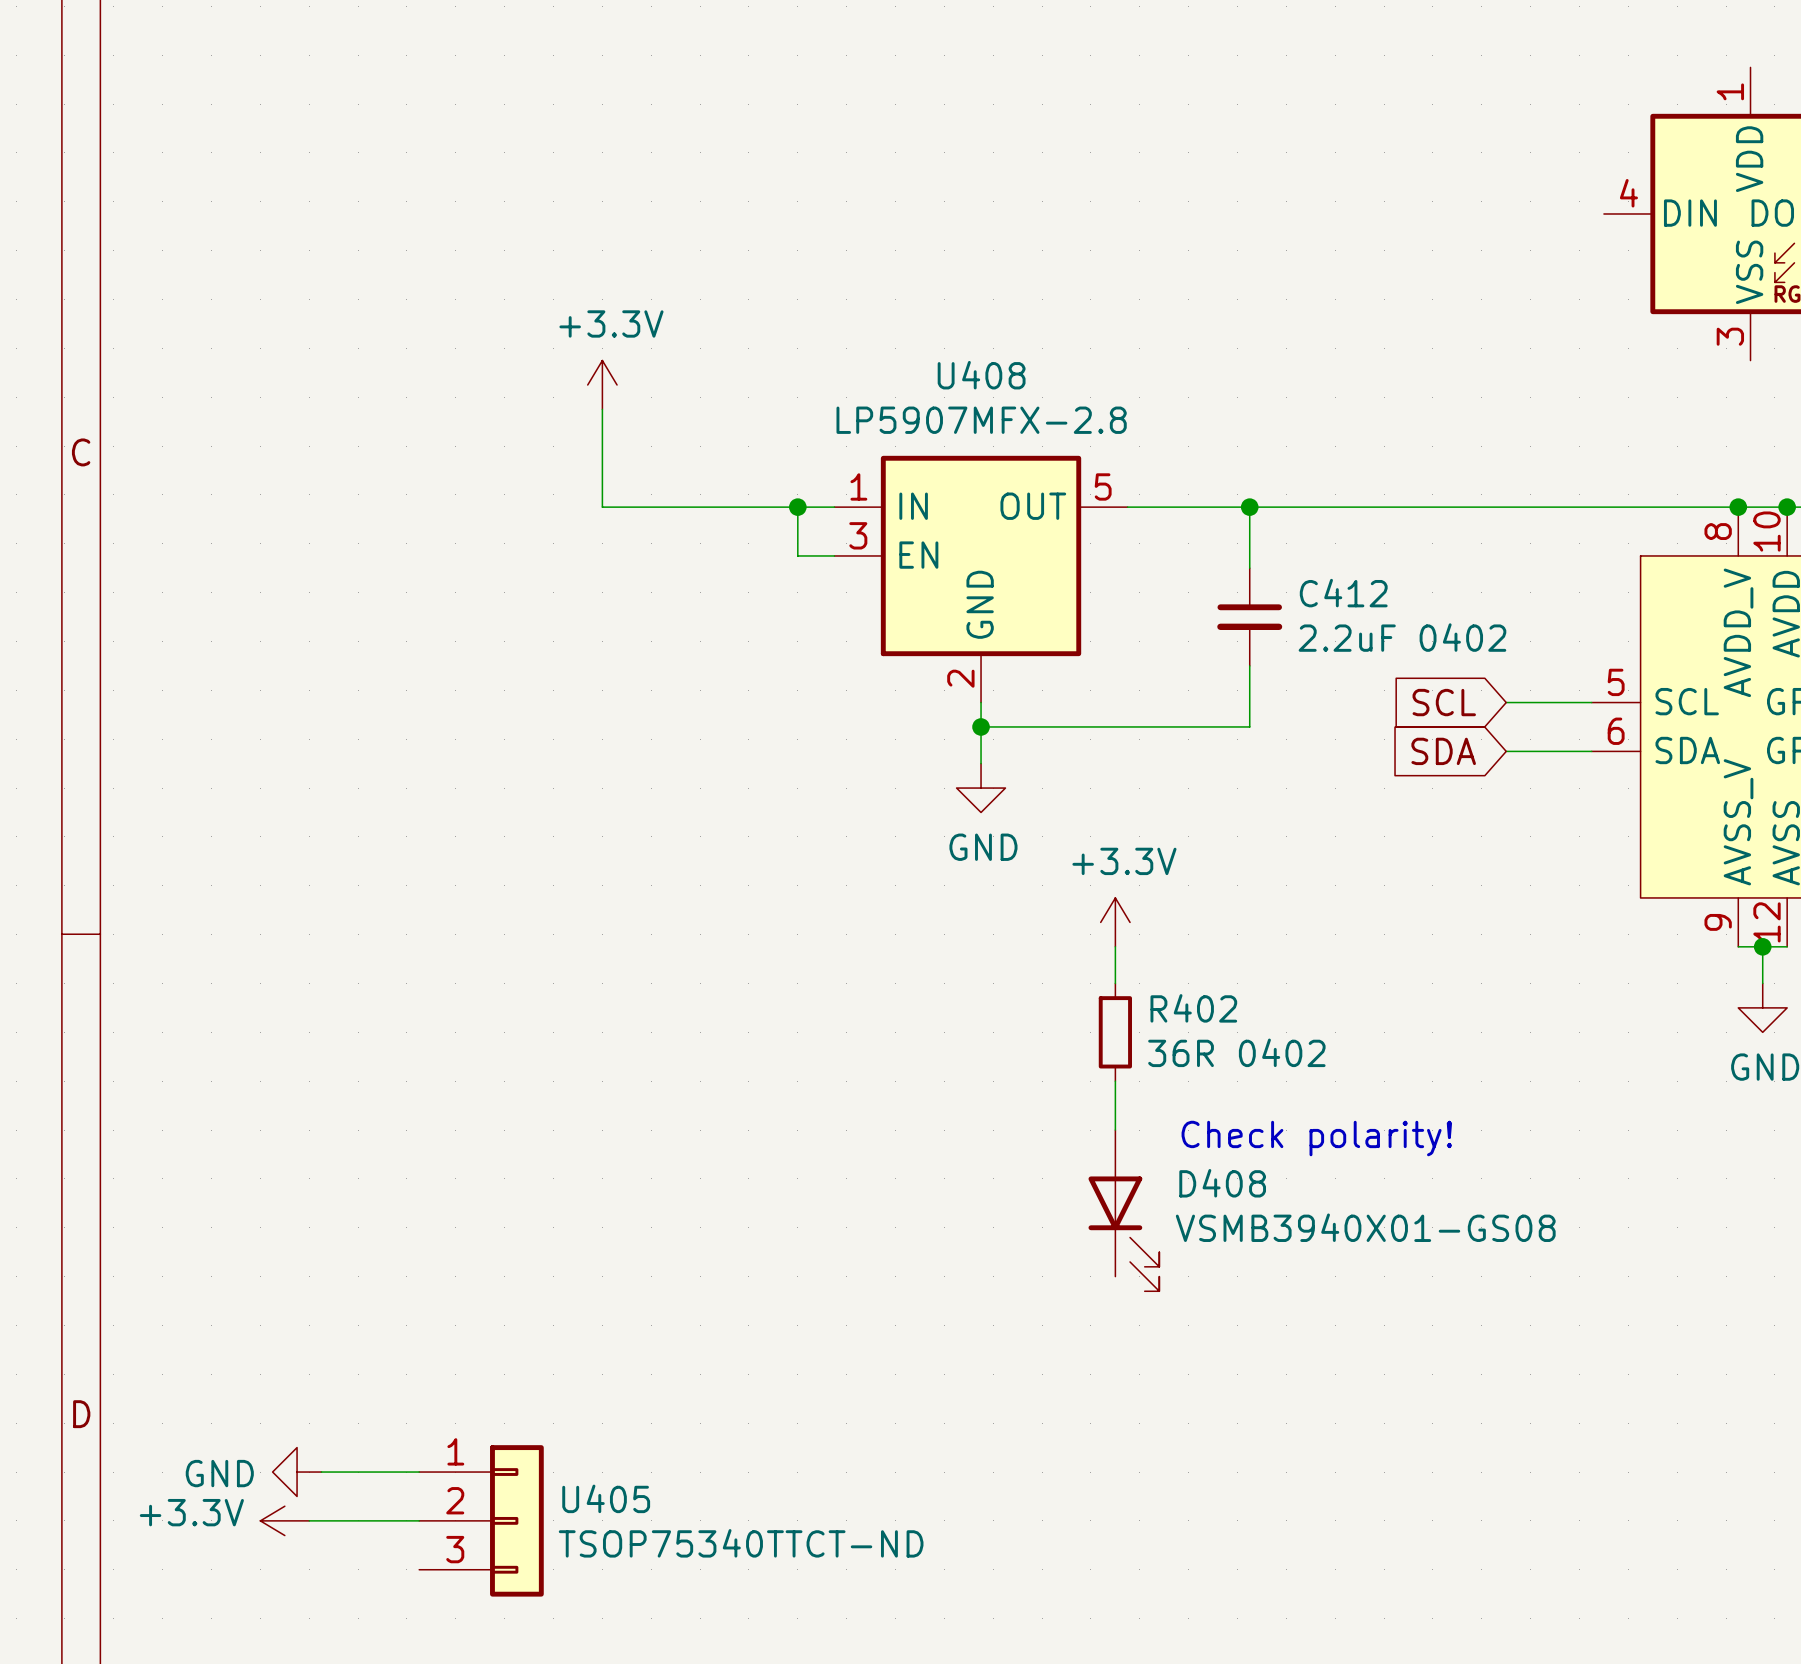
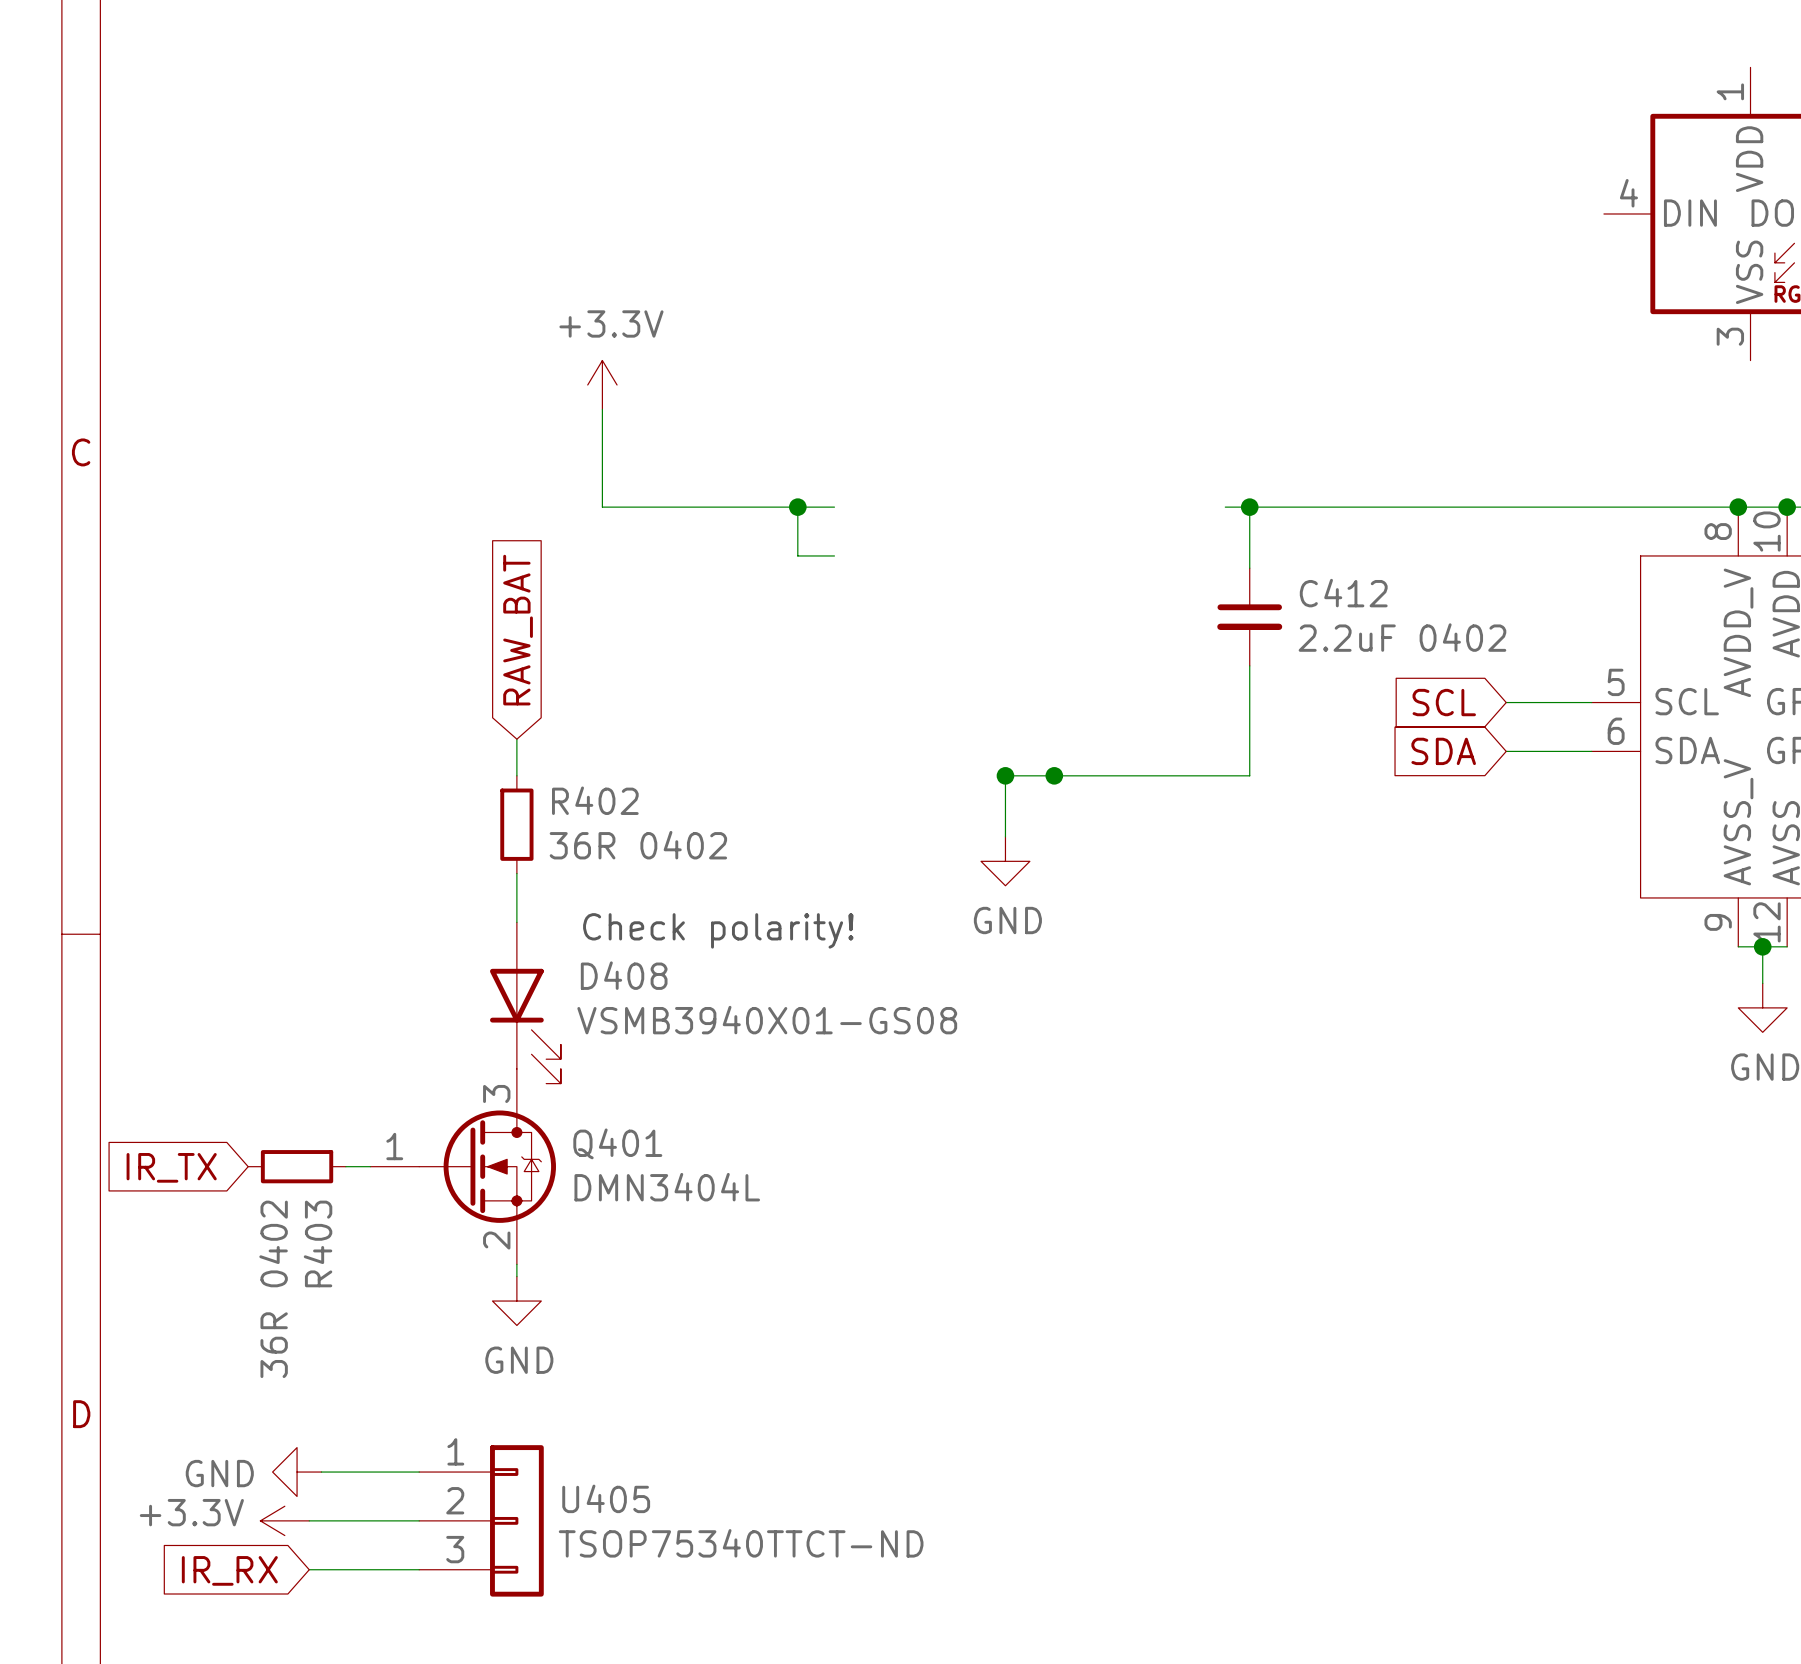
wire: (1127, 507) (1225, 507) -> none
U408: LP5907MFX-2.8 (981, 579) -> none
global label: none -> RAW_BAT (518, 630)
wire: (981, 702) (981, 763) -> none
wire: (981, 726) (1249, 726) -> (1005, 836) (1005, 775) (1249, 775) (1249, 726)
junction: (981, 726) -> none
wire: none -> (516, 739) (516, 775)
junction: none -> (1005, 775)
junction: none -> (1054, 775)
power symbol position: GND (981, 788) -> GND (1005, 861)
wire: none -> (516, 873) (516, 922)
power symbol: +3.3V (1115, 922) -> none
text: none -> Check polarity! (718, 930)
wire: (1115, 946) (1115, 983) -> none
R402 position: (1115, 1032) -> (516, 824)
wire: (1115, 1081) (1115, 1130) -> none
text: Check polarity! (1316, 1138) -> none
R403: none -> 36R 0402 (297, 1166)
wire: none -> (345, 1166) (370, 1166)
Q401: none -> DMN3404L (463, 1166)
global label: none -> IR_TX (171, 1167)
D408 position: (1123, 1210) -> (525, 1003)
wire: none -> (516, 1264) (516, 1276)
power symbol: none -> GND (516, 1301)
wire: none -> (309, 1569) (419, 1569)
global label: none -> IR_RX (229, 1570)

